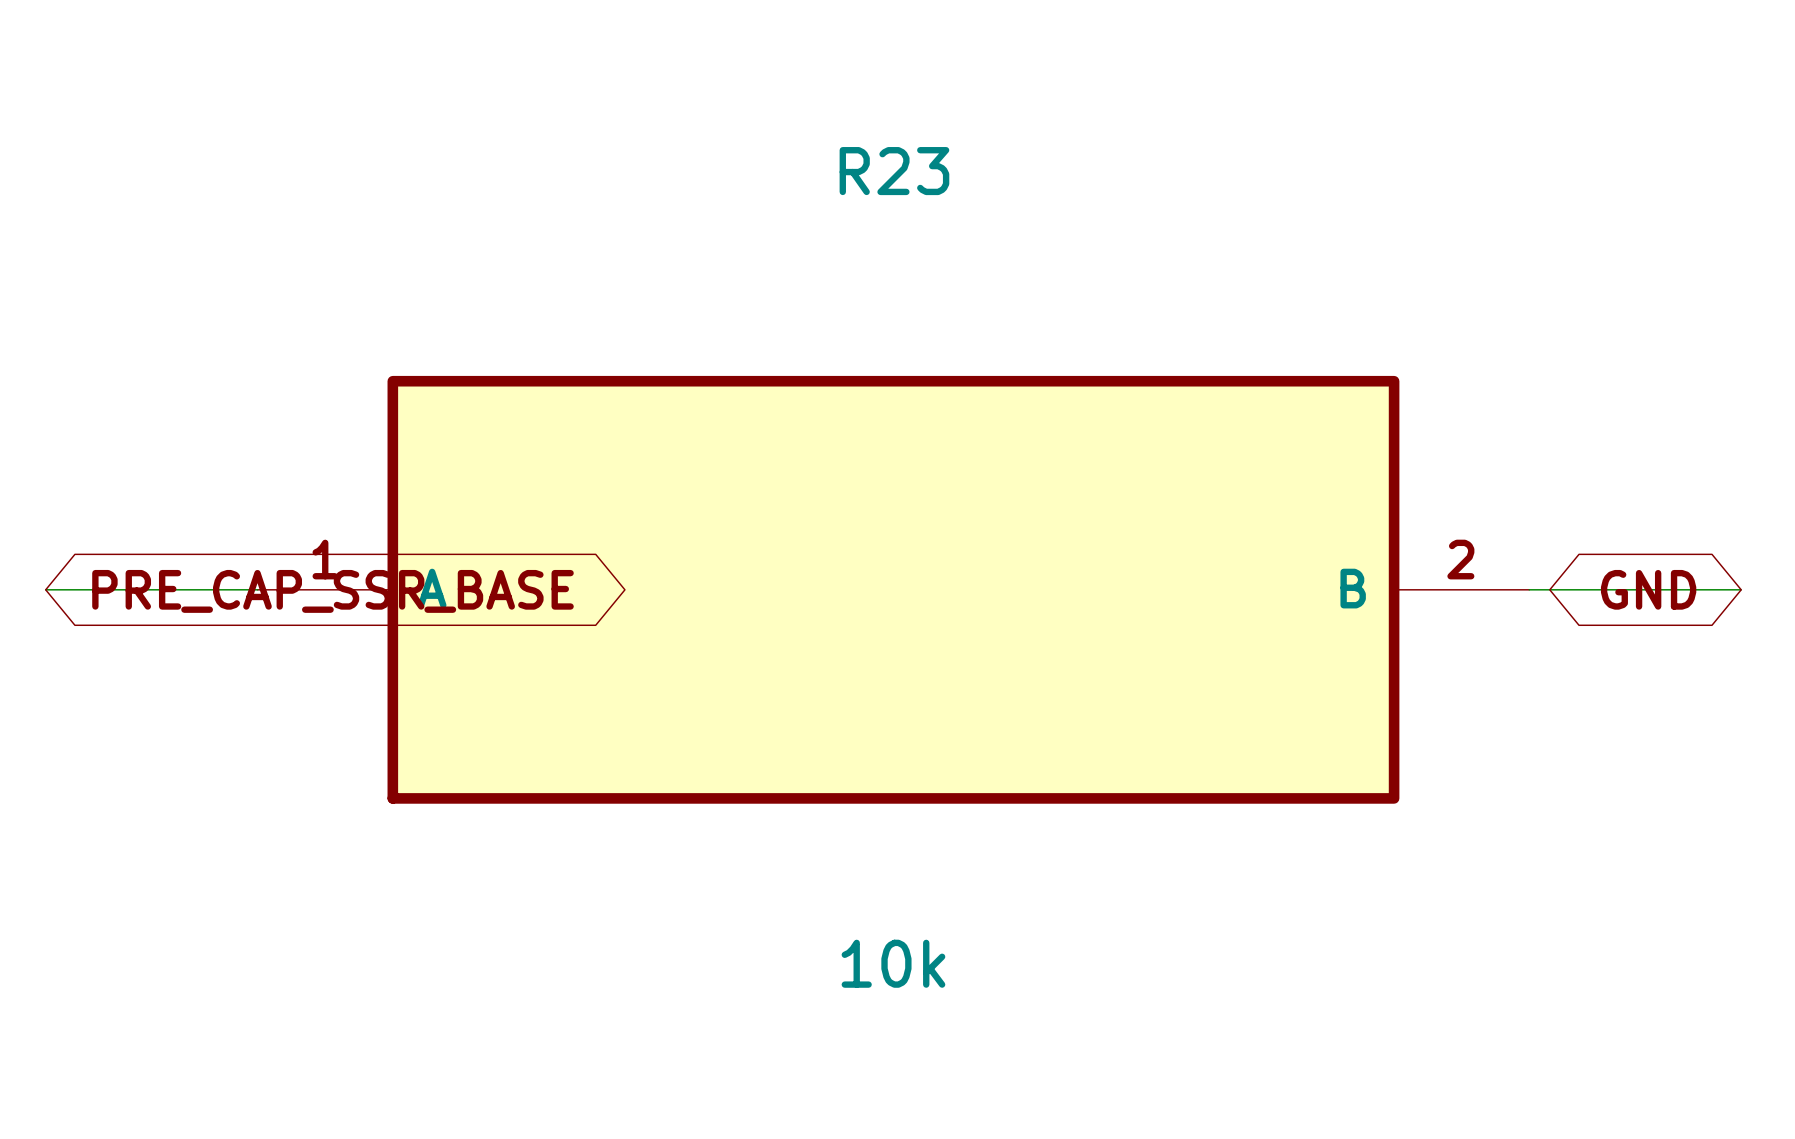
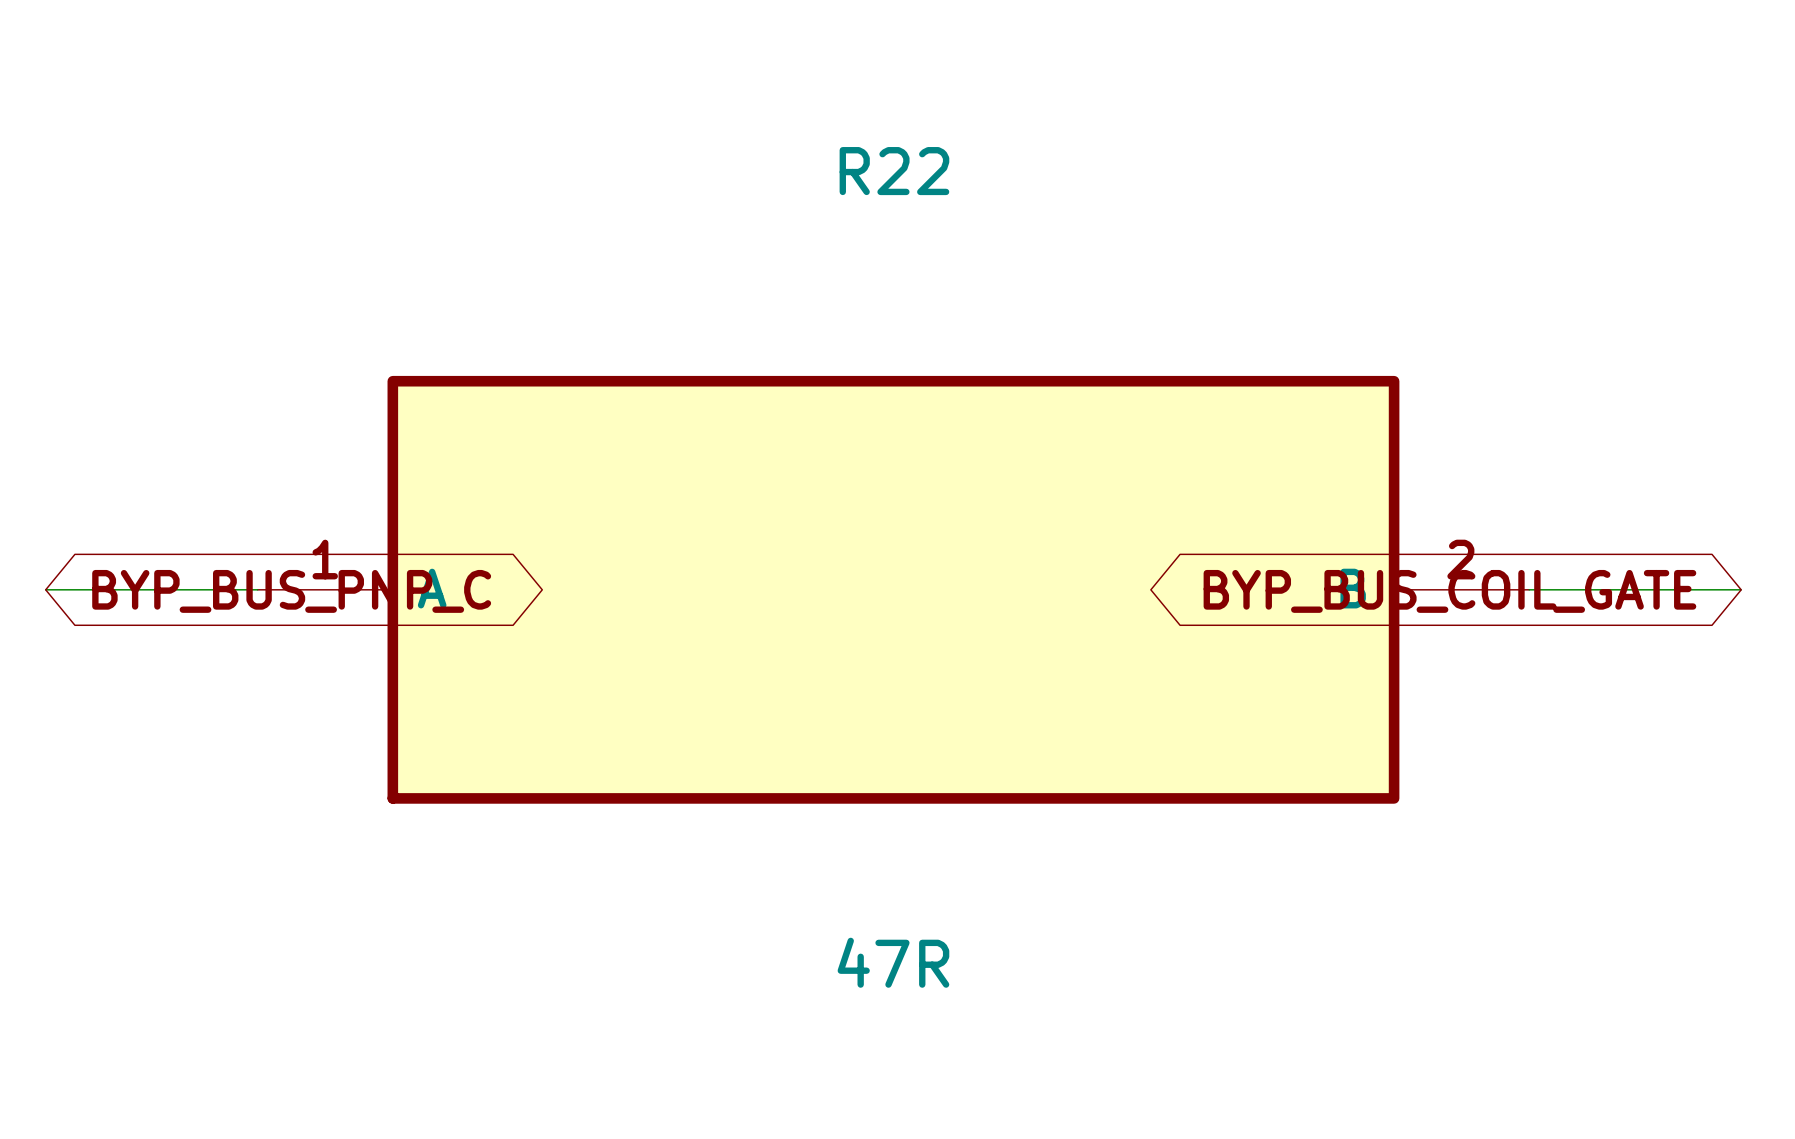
R23 name: R23 (894, 171) -> R22 (894, 171)
global label: GND (1648, 589) -> BYP_BUS_COIL_GATE (1449, 591)
global label: PRE_CAP_SSR_BASE (332, 591) -> BYP_BUS_PNP_C (291, 591)
R23 value: 10k (893, 963) -> 47R (893, 962)

